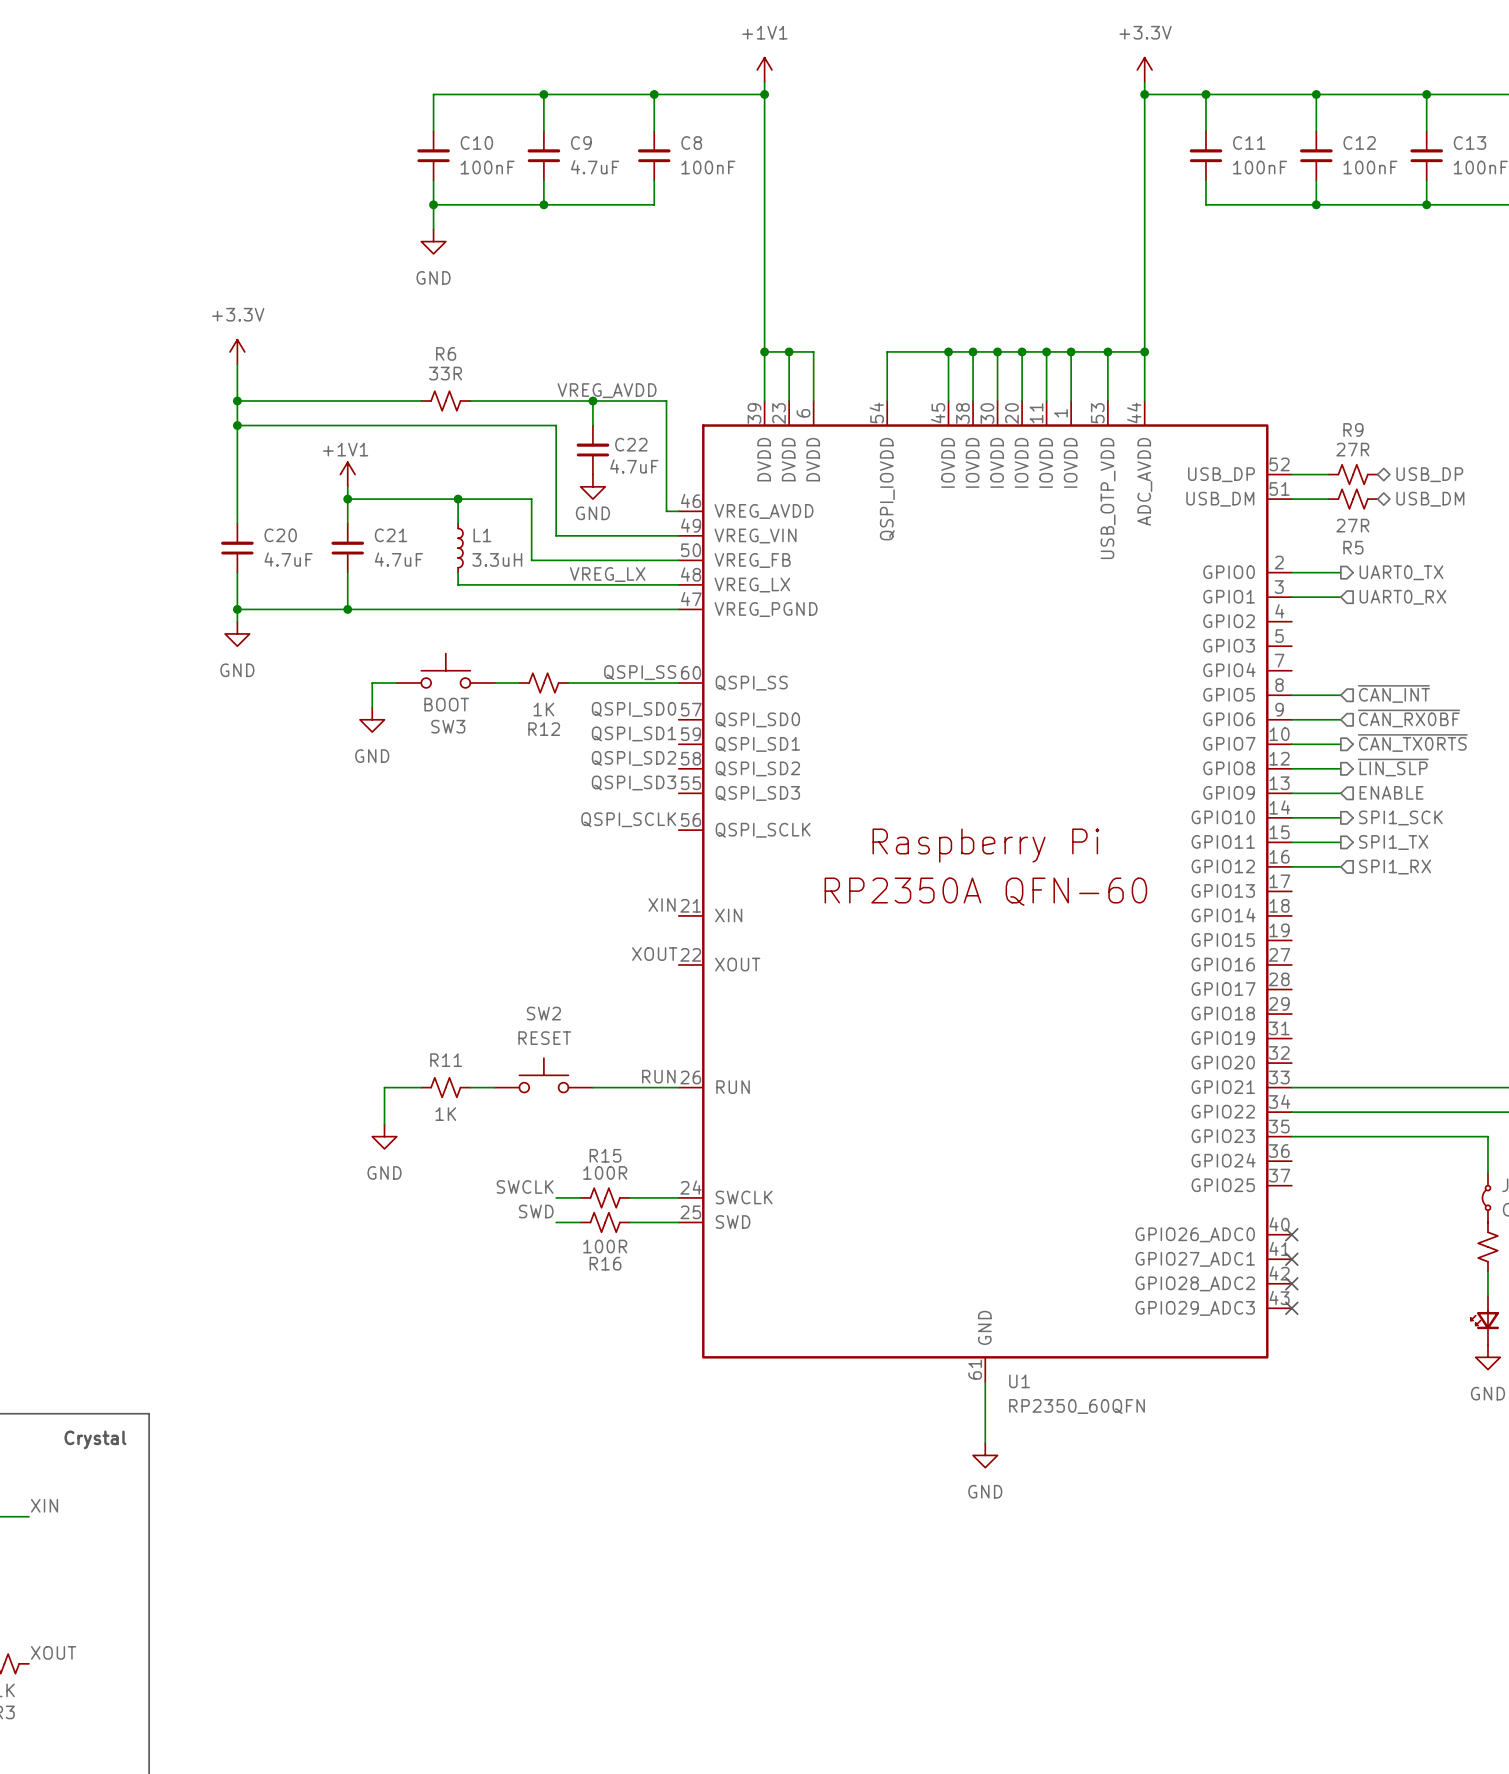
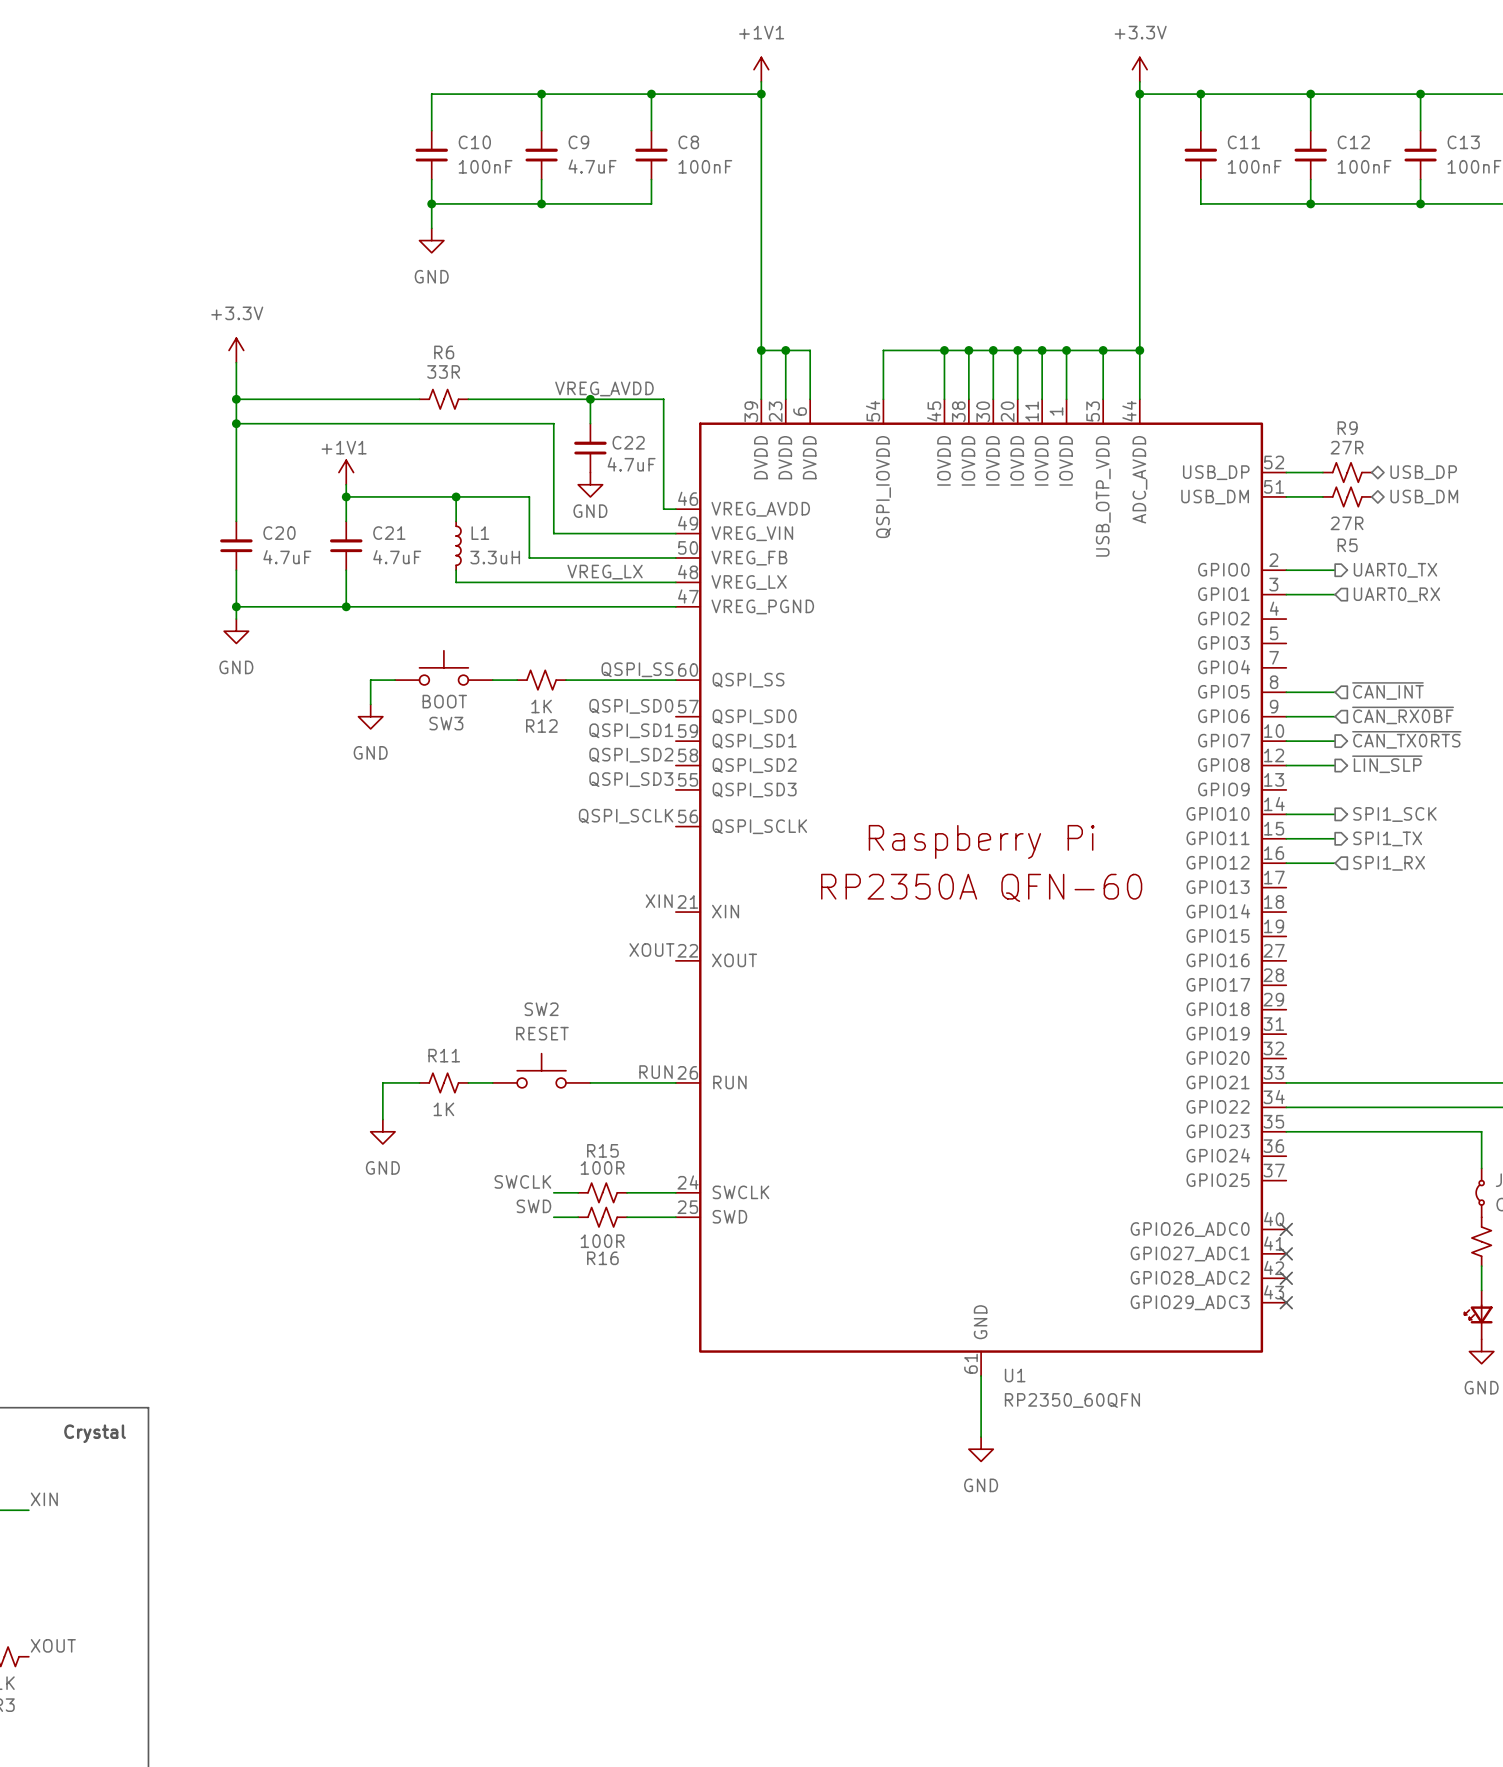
hierarchical label: ENABLE (1391, 792) -> none
wire: (1291, 793) (1340, 793) -> none

